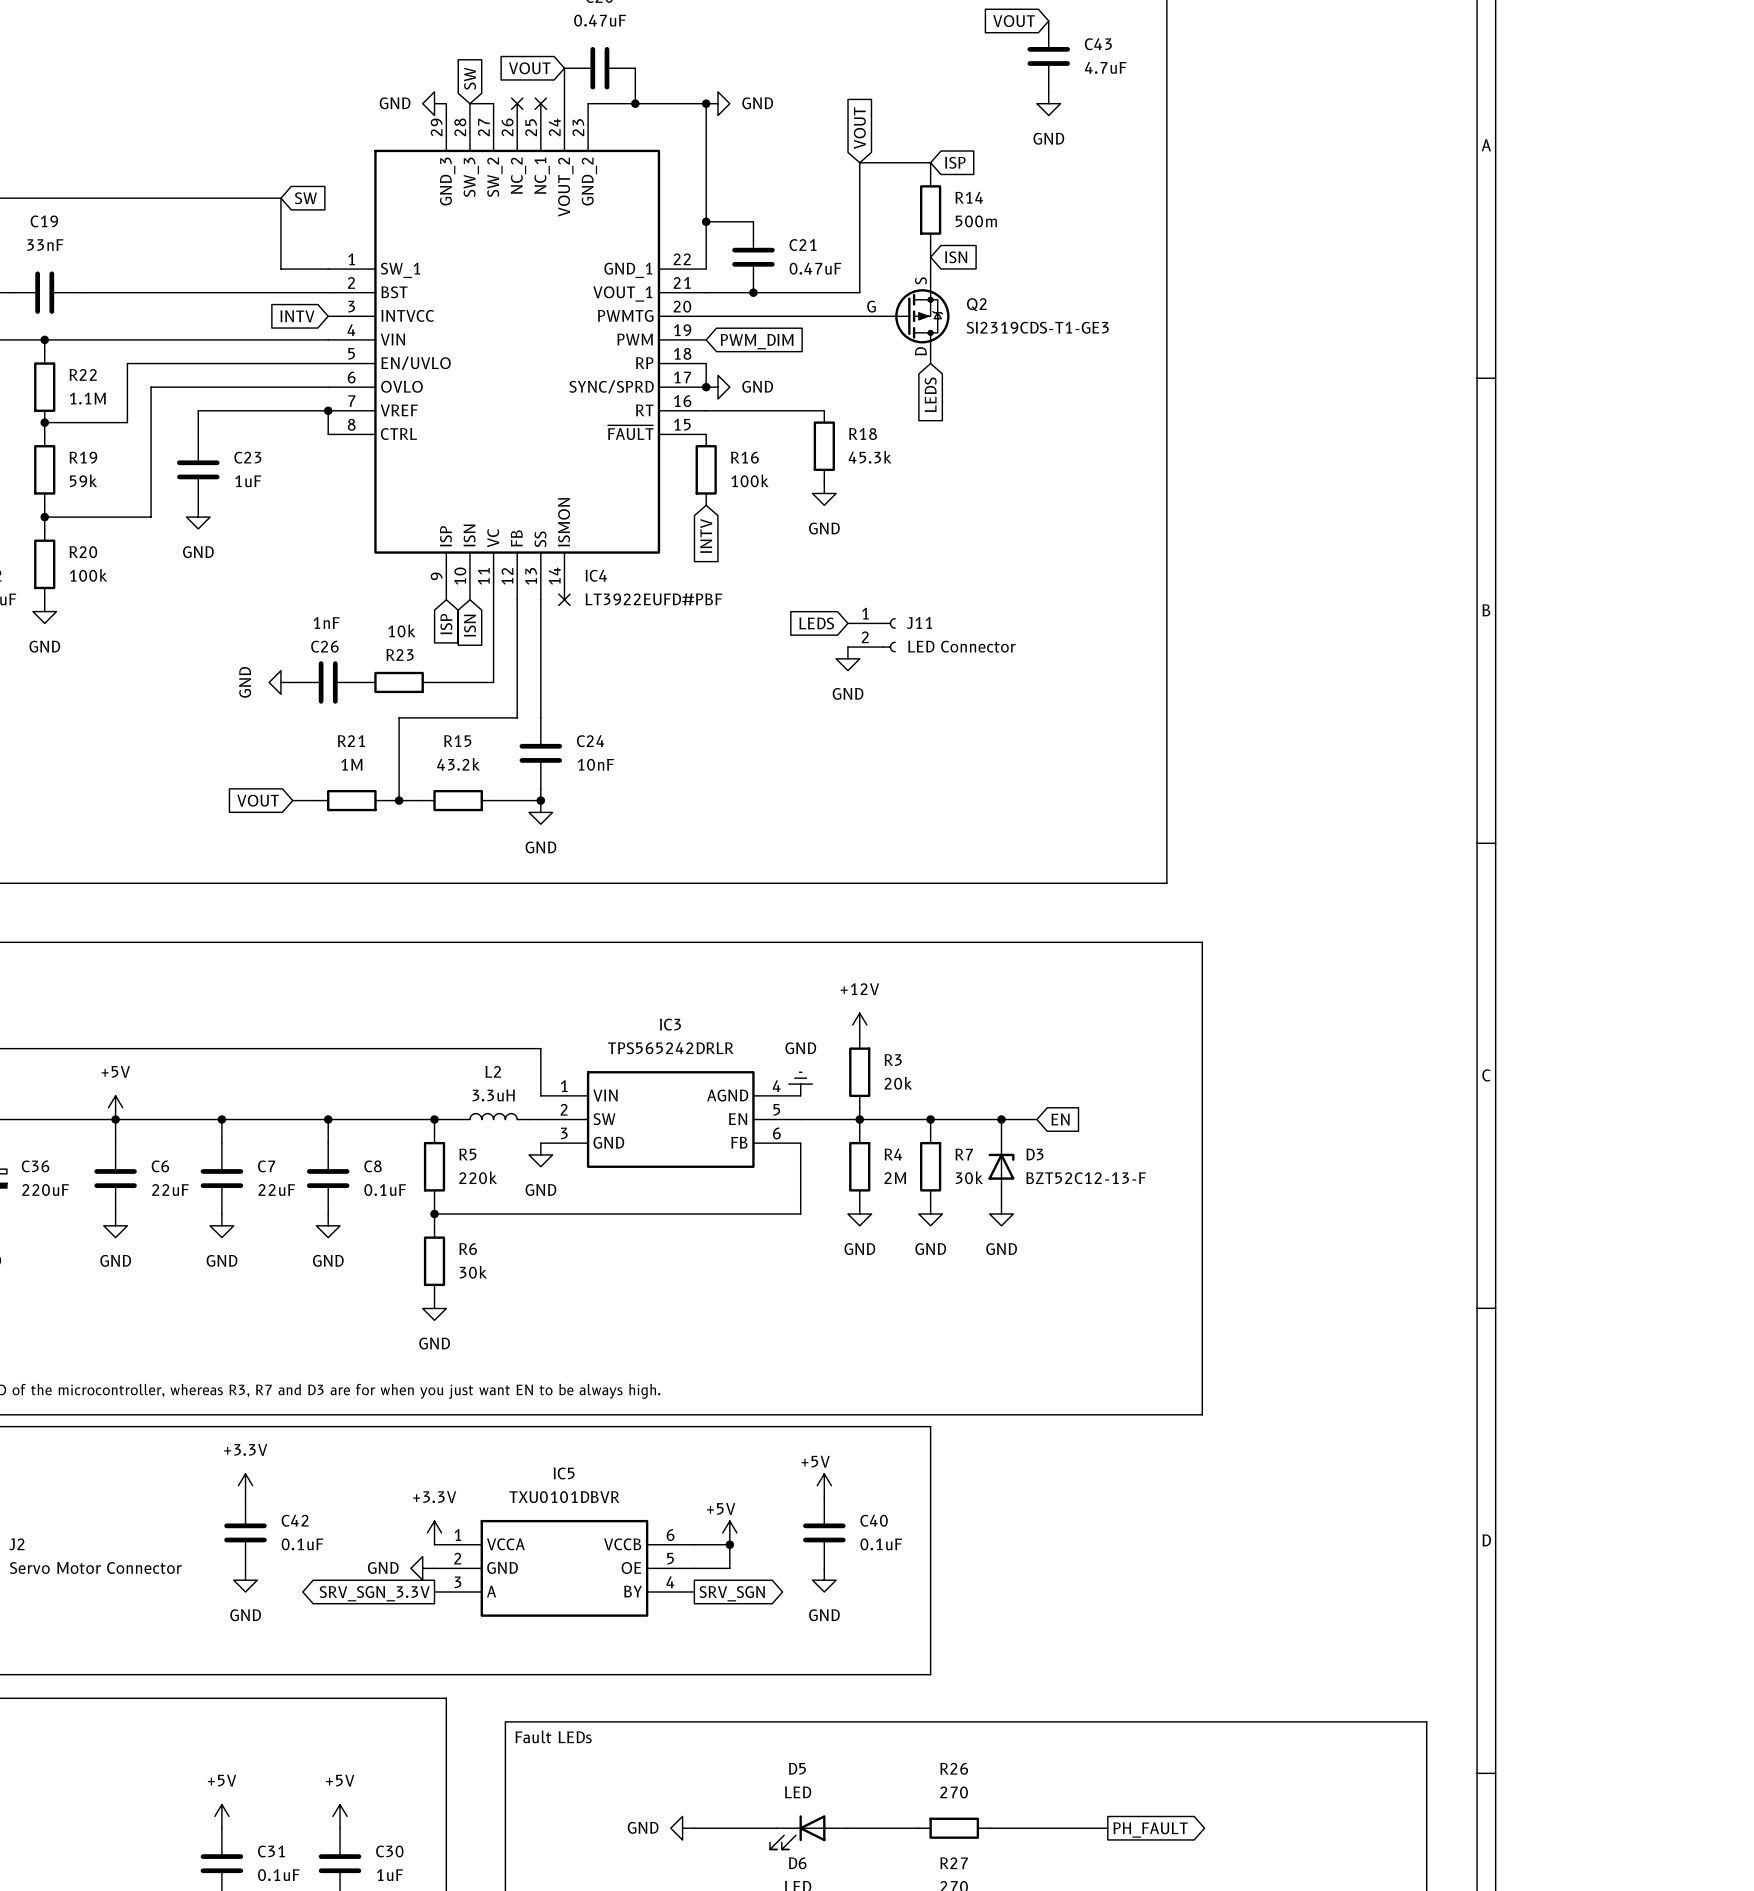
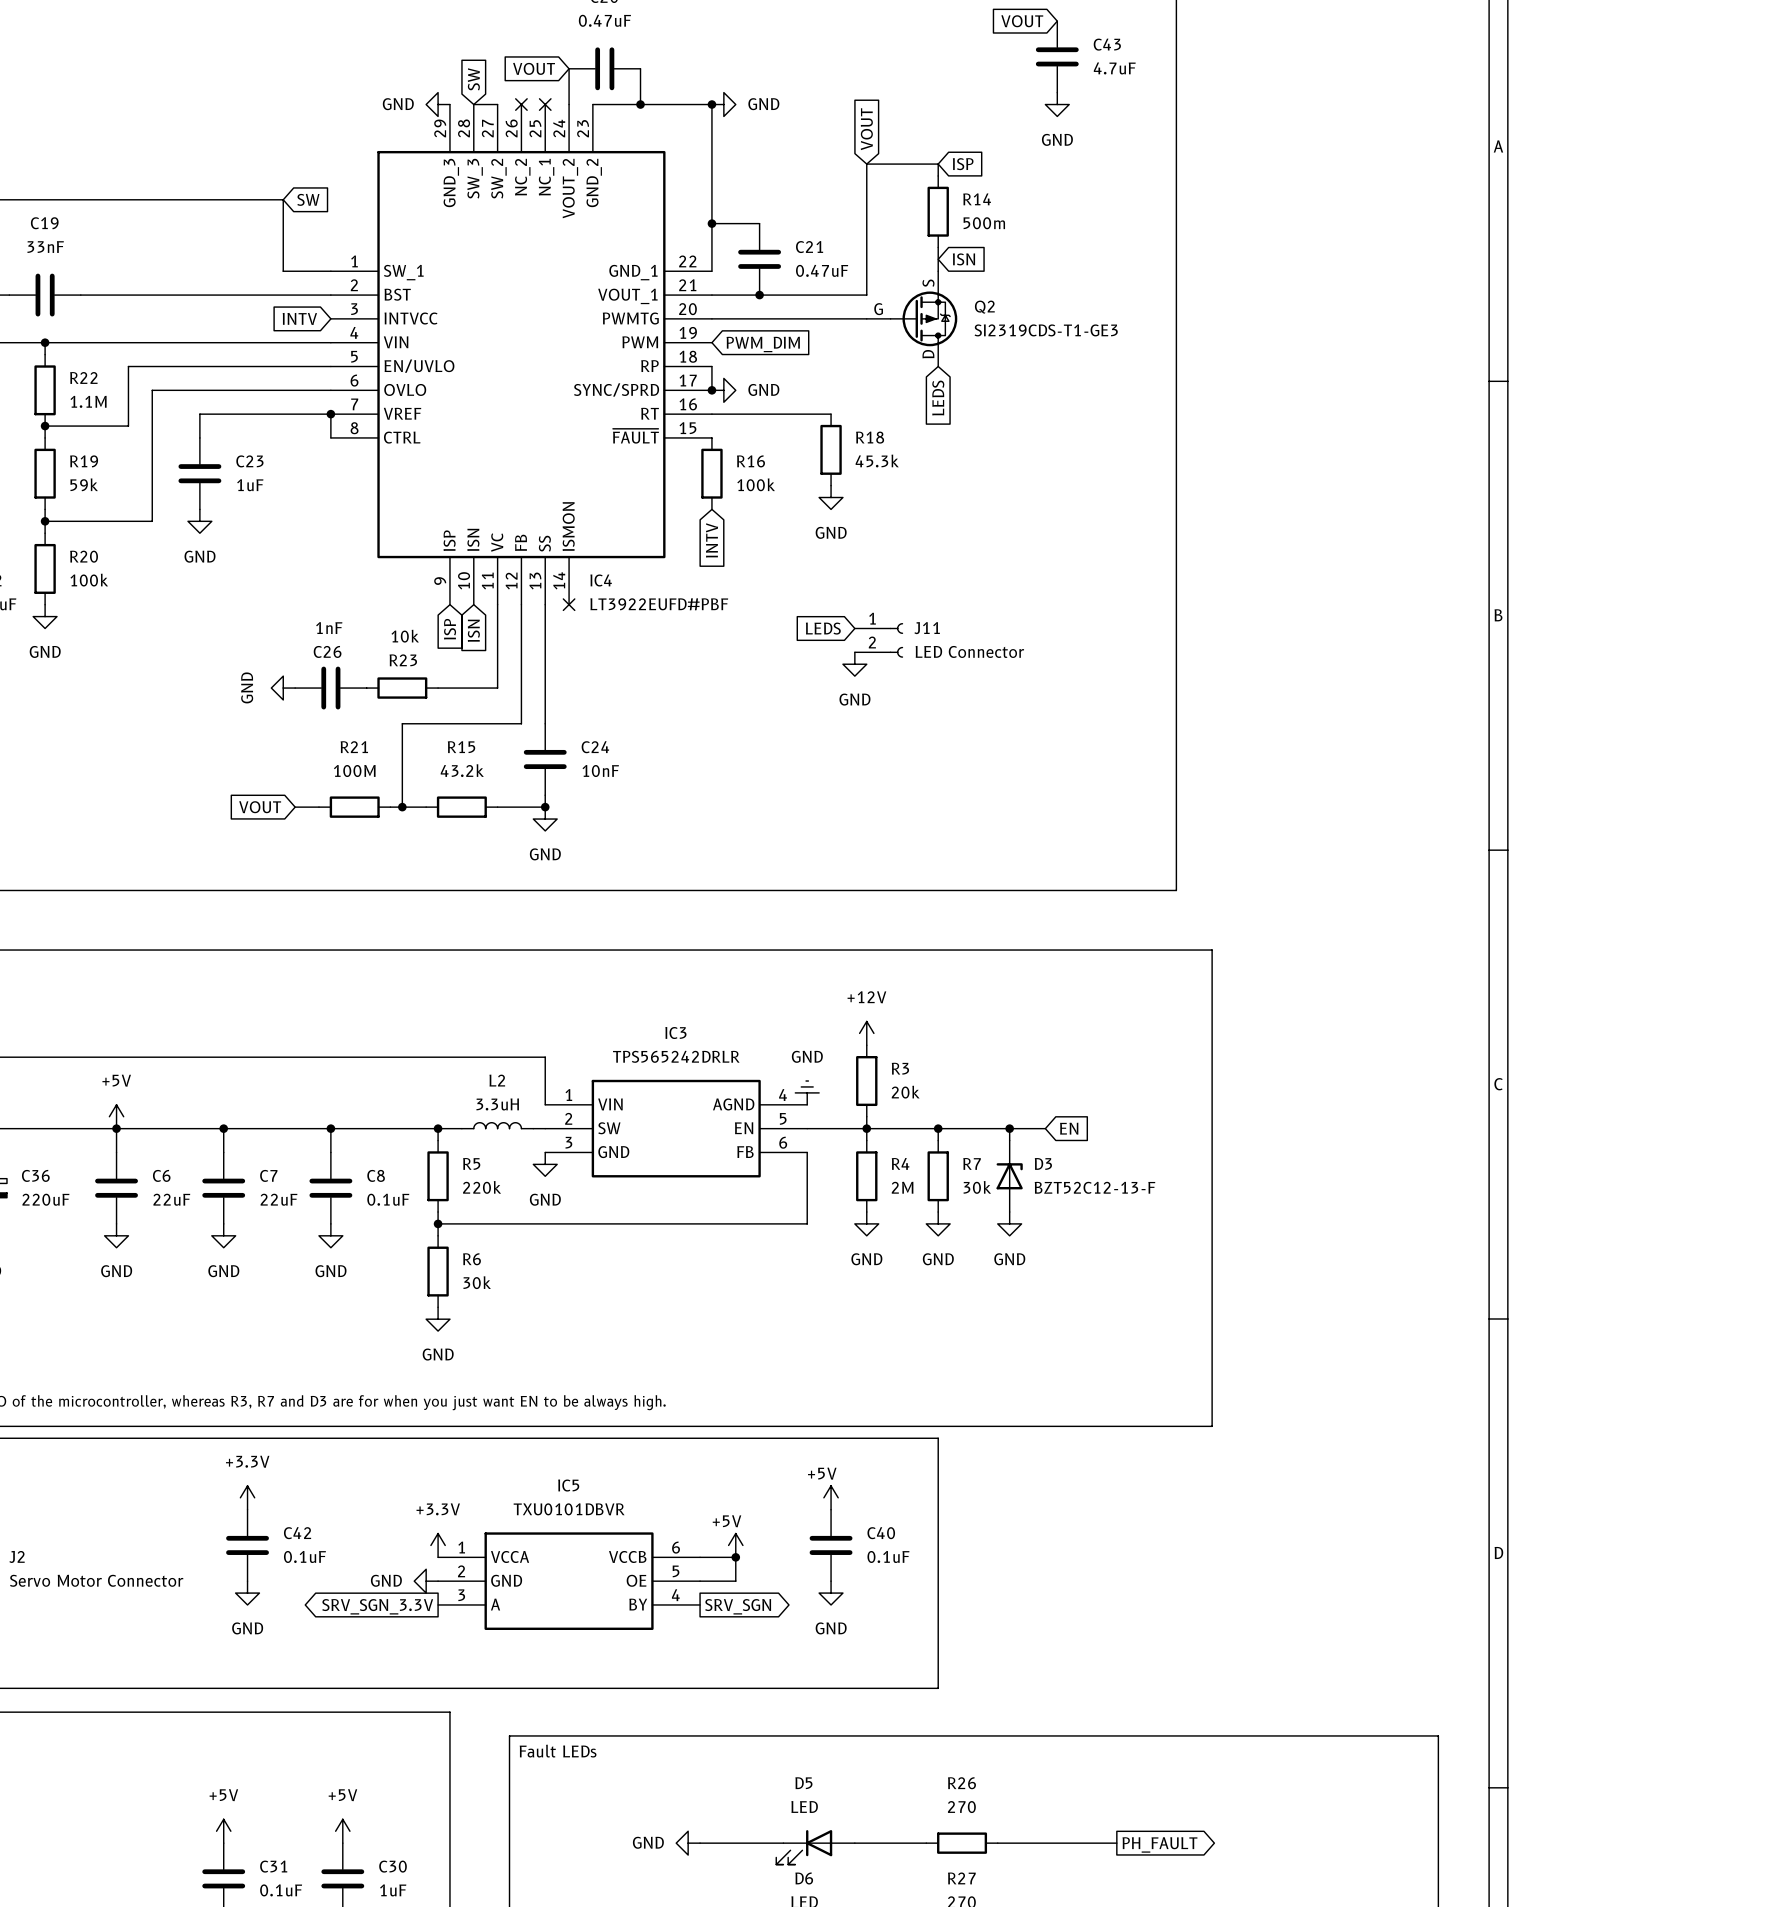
R21 value: 1M (351, 764) -> 100M (354, 771)

